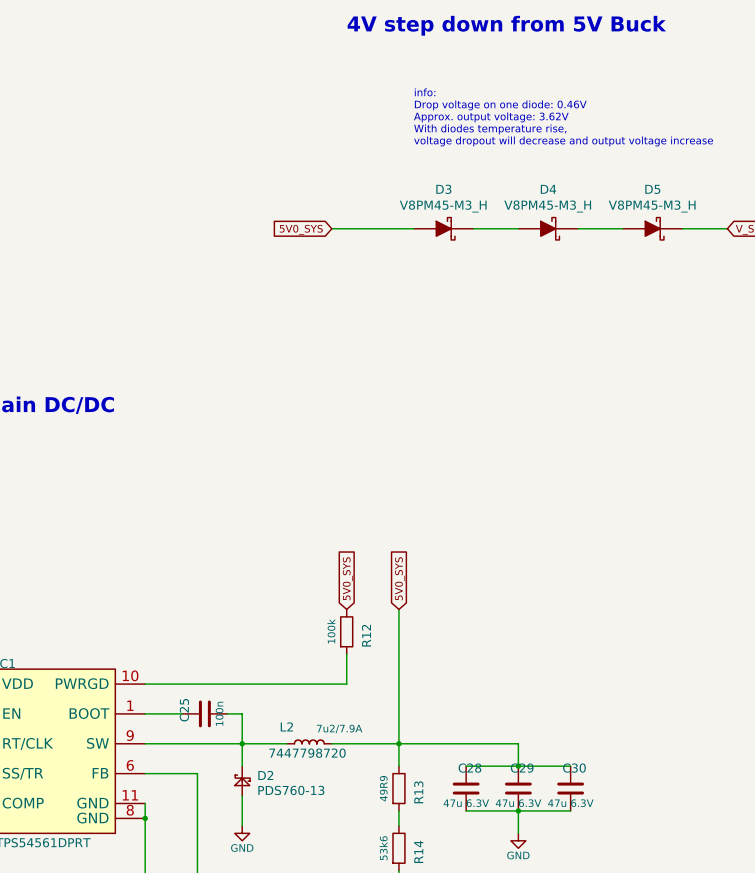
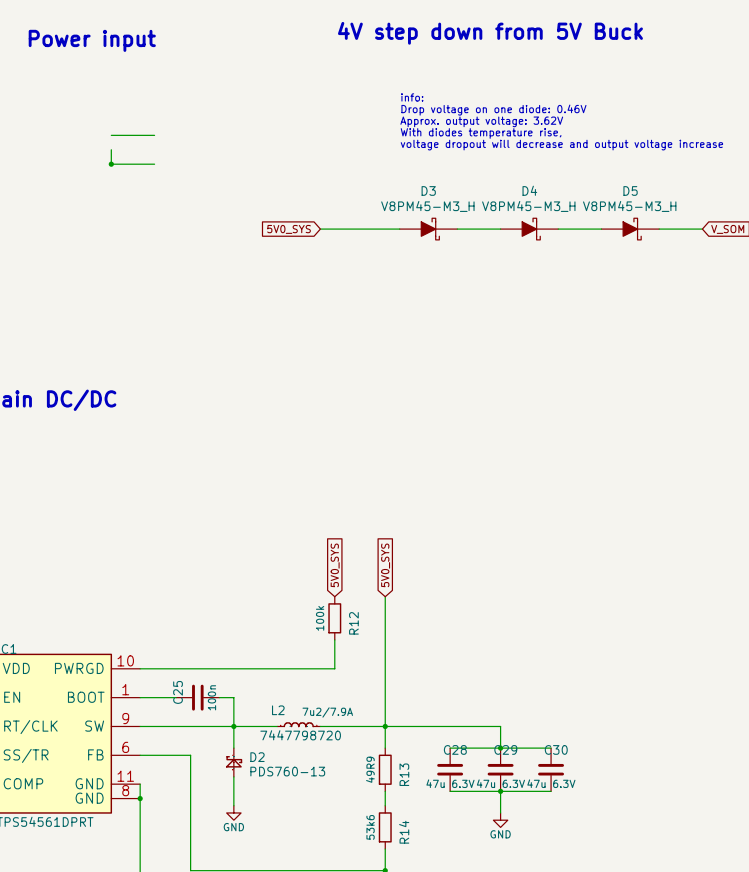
text: none -> Power input (92, 40)
wire: none -> (111, 135) (154, 135)
wire: none -> (111, 149) (111, 164) (154, 164)
junction: none -> (111, 164)

